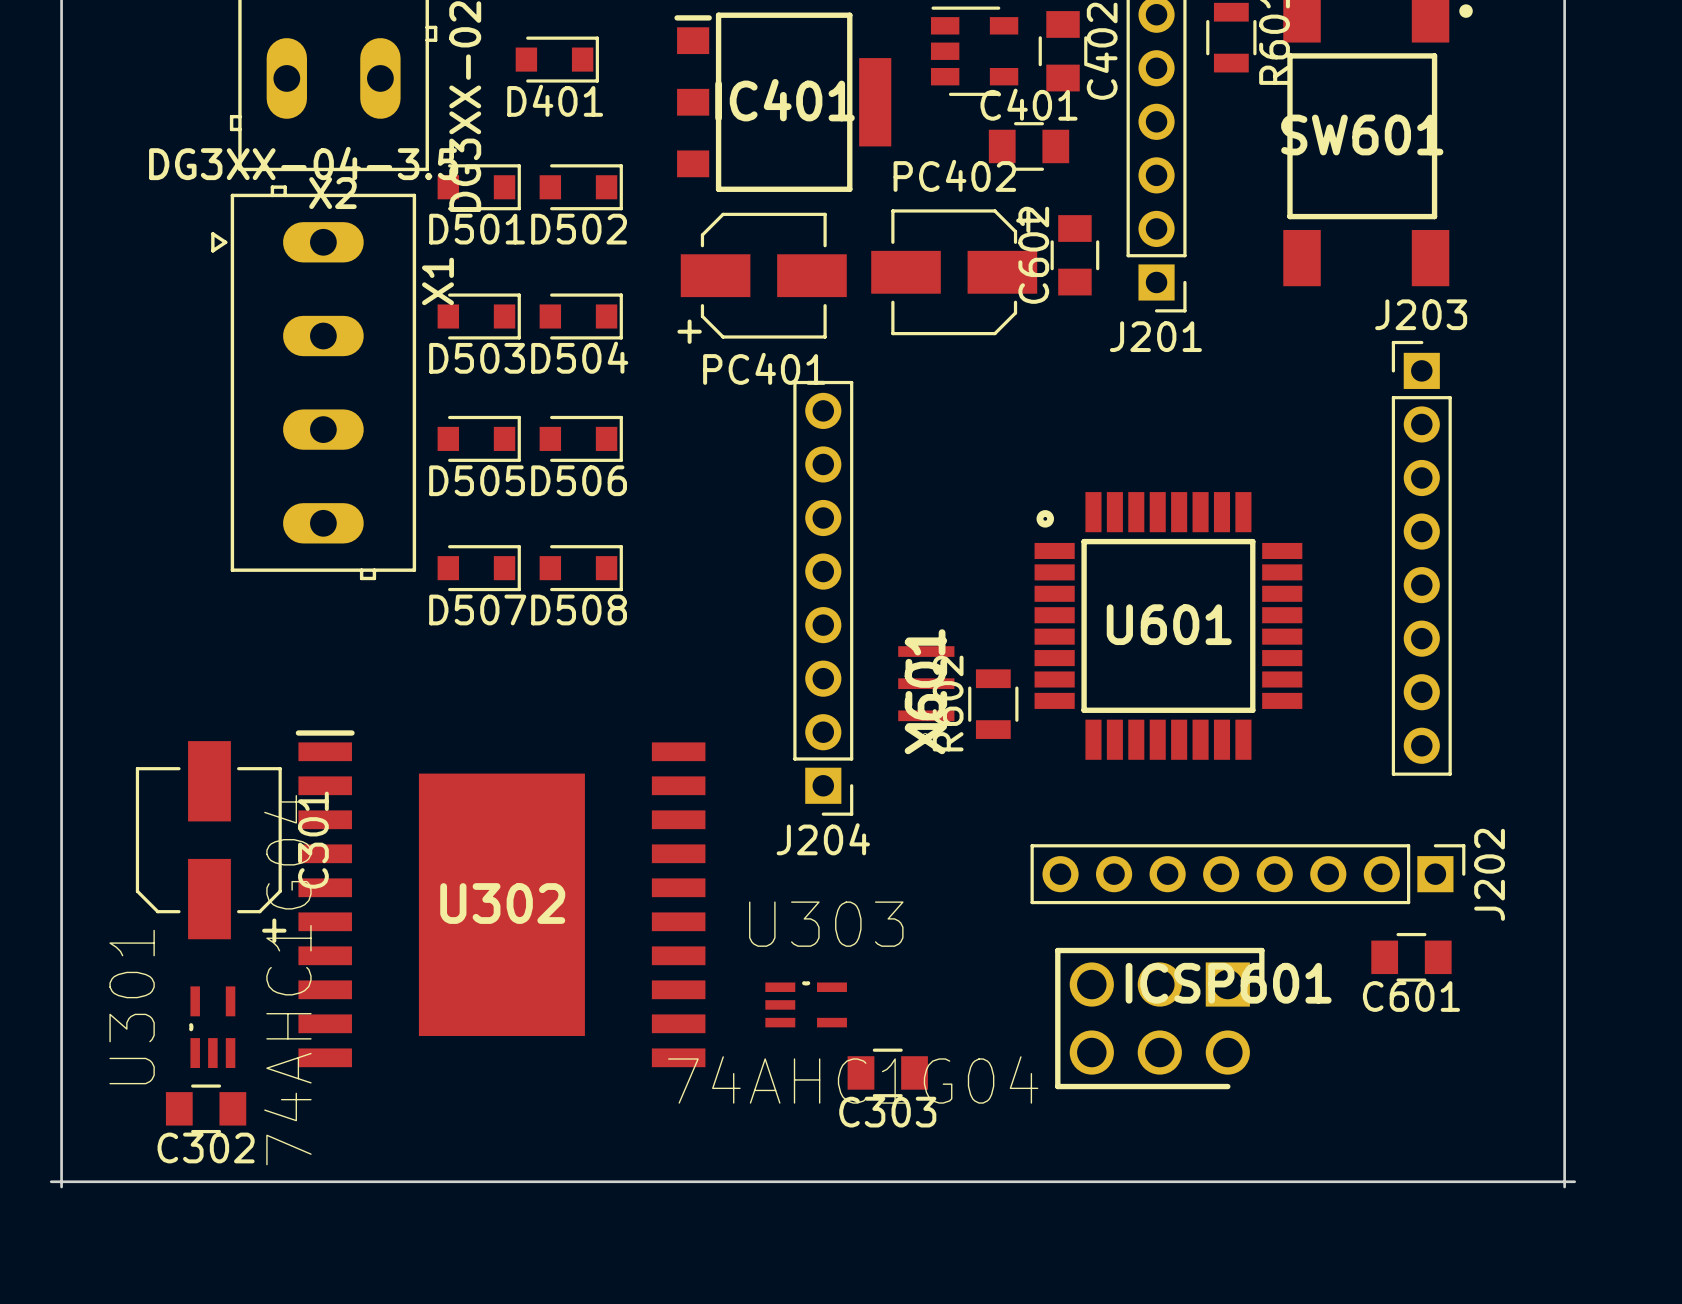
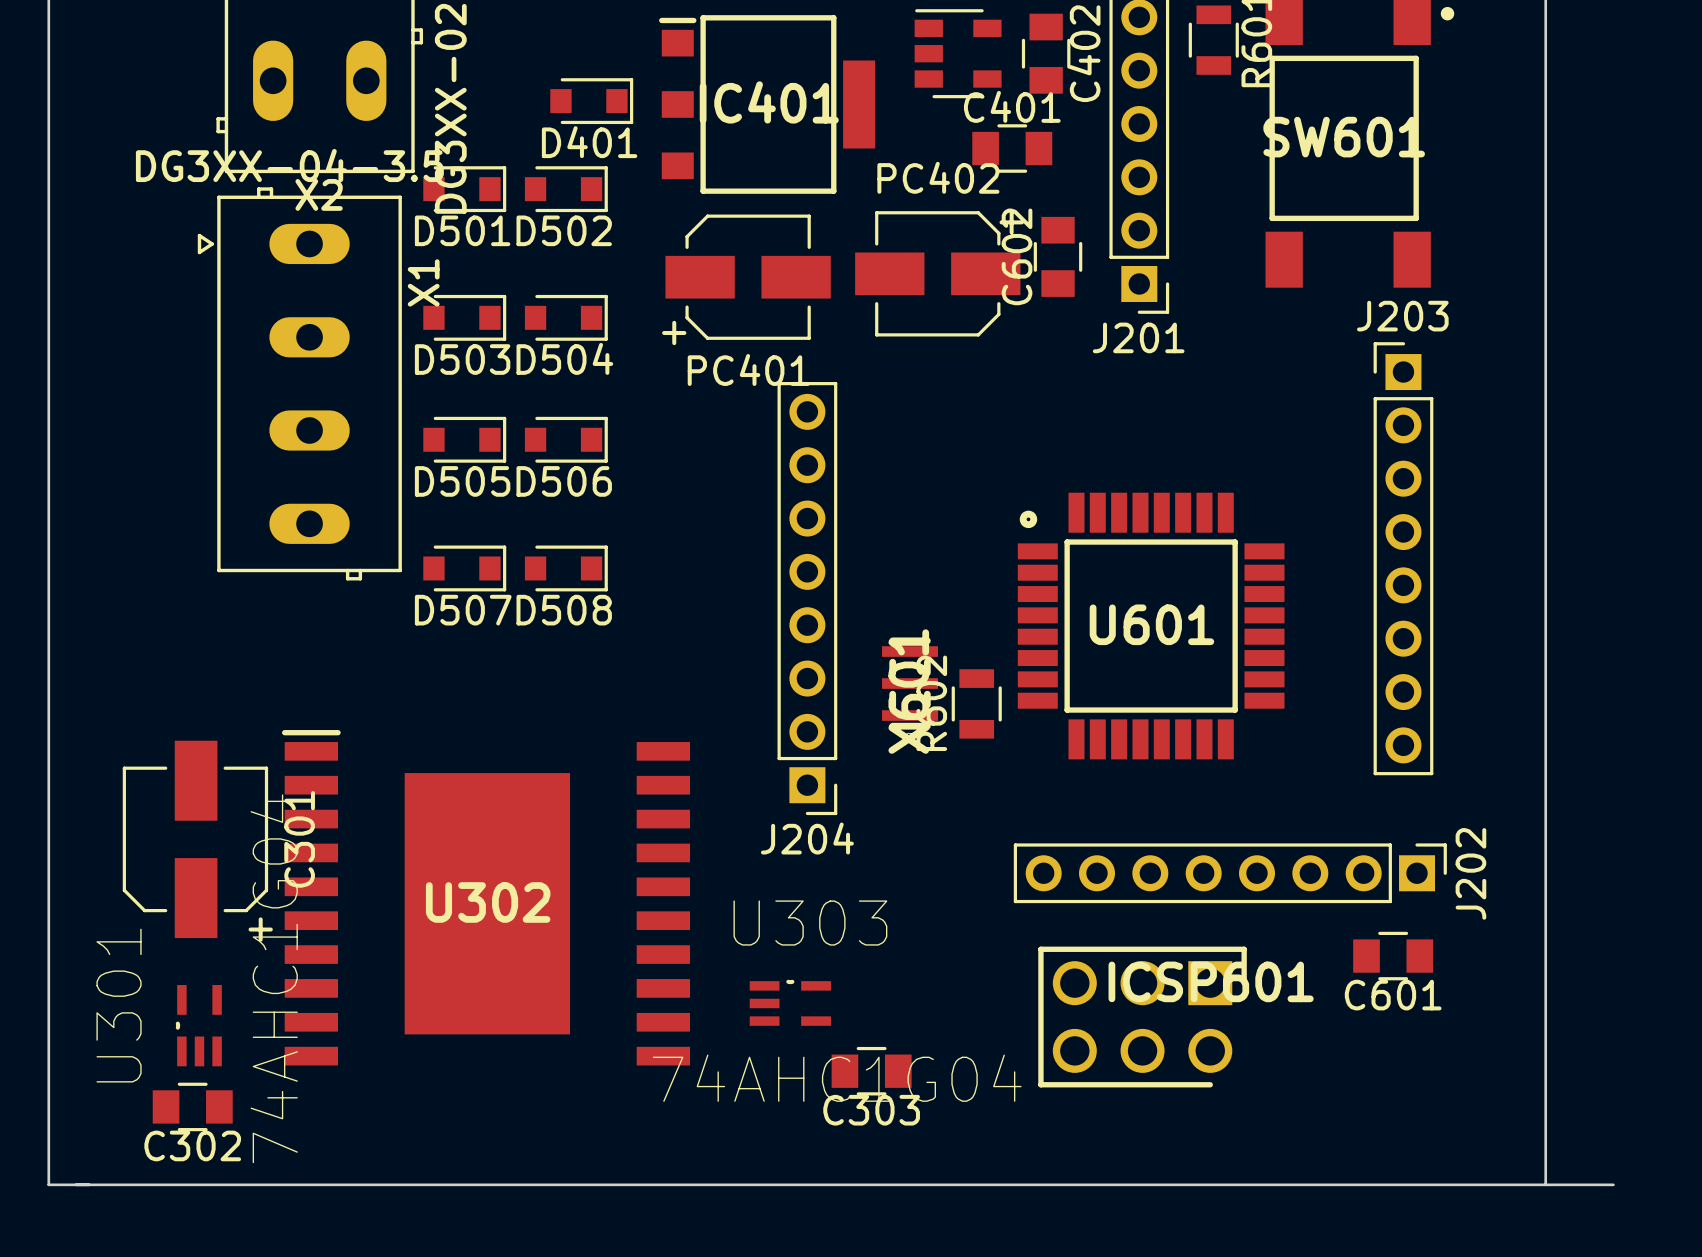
D401 position: (557, 59) -> (591, 101)
board edge: (51, 1181) (1574, 1181) -> none
board edge: none -> (48, 1184) (1613, 1184)

